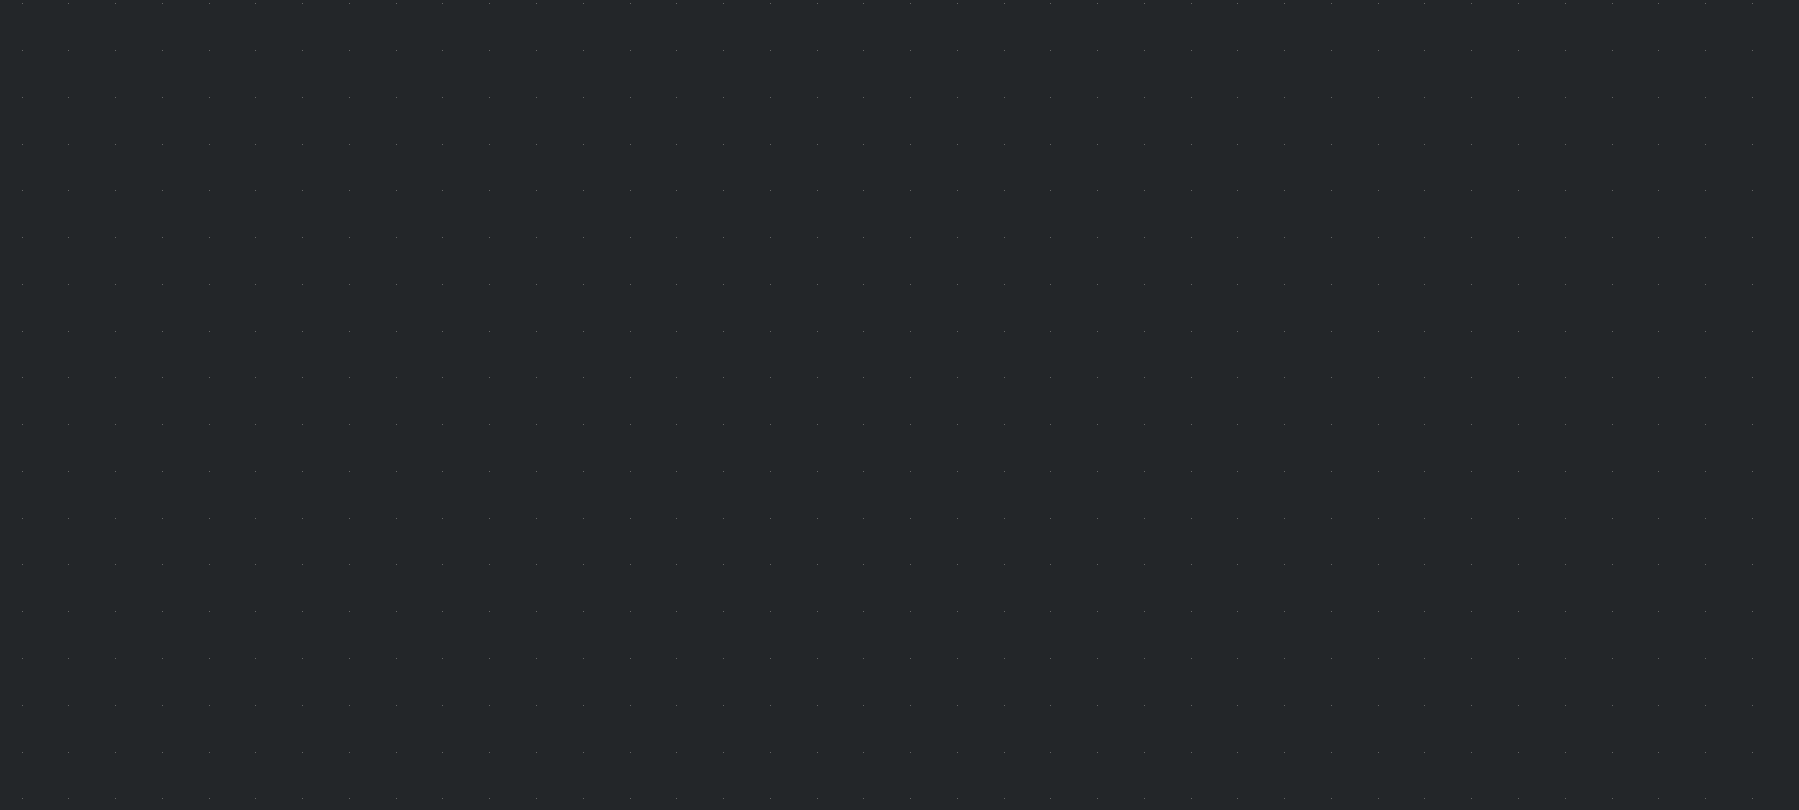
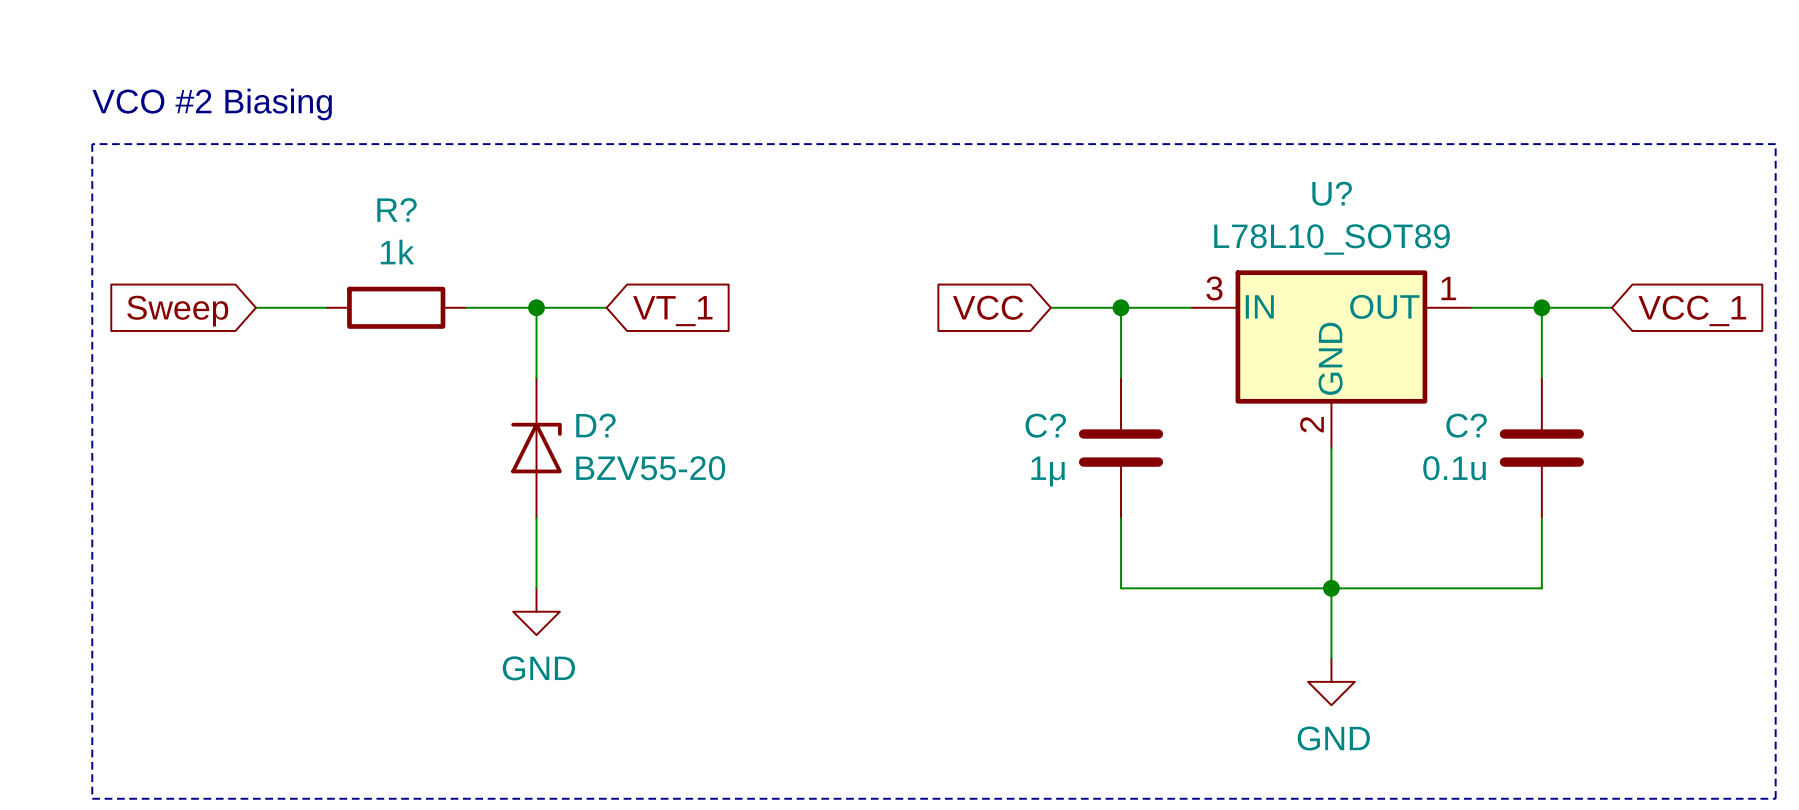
text: none -> VCO #2 Biasing (212, 104)
line: none -> (92, 144) (1775, 144) (1775, 798) (92, 798) (92, 144)
wire: none -> (255, 307) (326, 307)
R?: none -> 1k (396, 307)
wire: none -> (466, 307) (606, 307)
wire: none -> (536, 307) (536, 377)
junction: none -> (536, 307)
global label: none -> VCC (988, 307)
wire: none -> (1050, 307) (1191, 307)
wire: none -> (1121, 307) (1121, 377)
junction: none -> (1121, 307)
wire: none -> (1471, 307) (1612, 307)
wire: none -> (1541, 307) (1541, 377)
junction: none -> (1541, 307)
global label: none -> Sweep (177, 311)
global label: none -> VT_1 (672, 311)
global label: none -> VCC_1 (1692, 310)
U?: none -> L78L10_SOT89 (1331, 359)
D?: none -> BZV55-20 (536, 448)
C?: none -> 1μ (1121, 448)
wire: none -> (1331, 448) (1331, 658)
C?: none -> 0.1u (1541, 448)
wire: none -> (536, 518) (536, 588)
wire: none -> (1121, 518) (1121, 588) (1541, 588) (1541, 518)
junction: none -> (1331, 588)
power symbol: none -> GND (536, 611)
power symbol: none -> GND (1331, 681)

